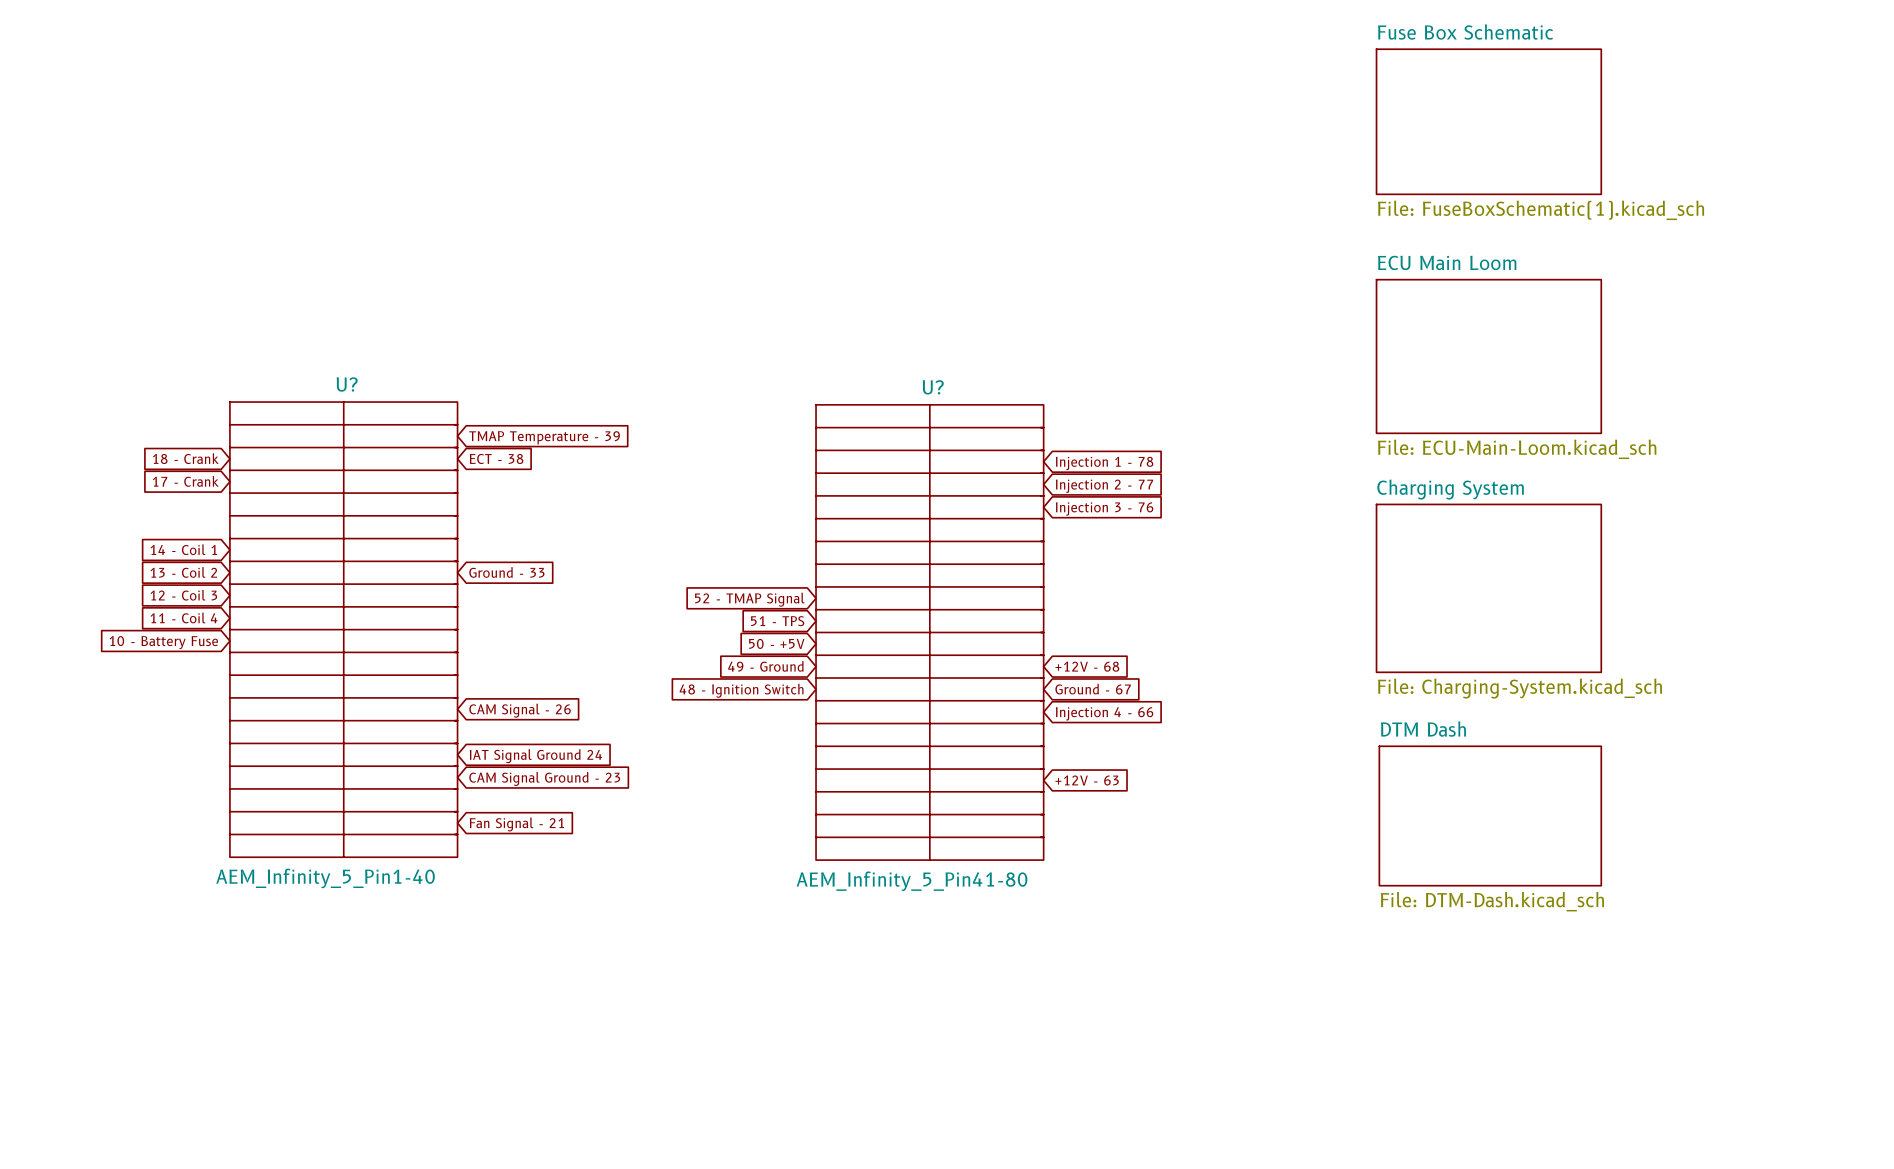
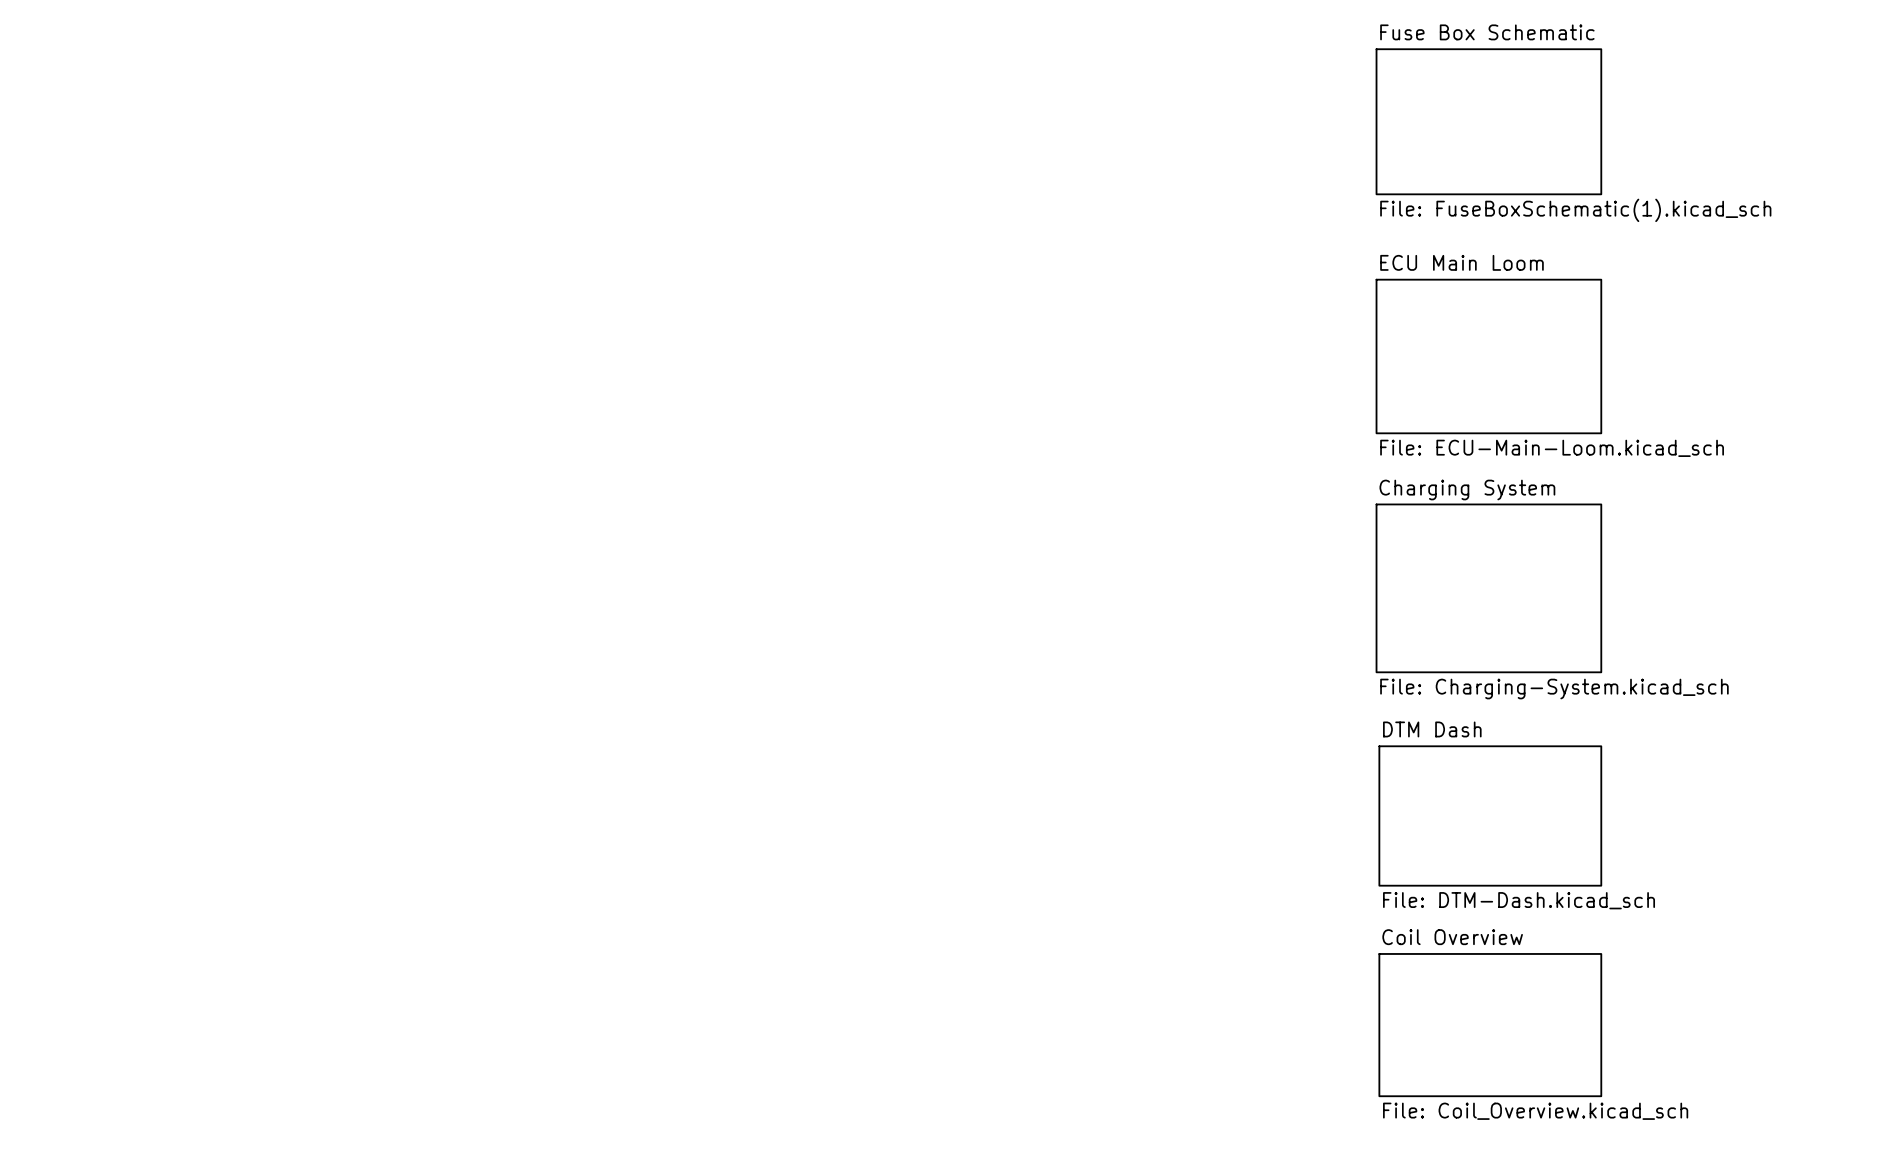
global label: TMAP Temperature - 39 (544, 437) -> none
global label: 18 - Crank (185, 458) -> none
global label: ECT - 38 (496, 458) -> none
global label: Injection 1 - 78 (1104, 463) -> none
global label: 17 - Crank (185, 481) -> none
global label: Injection 2 - 77 (1104, 486) -> none
global label: Injection 3 - 76 (1104, 508) -> none
global label: 14 - Coil 1 (183, 549) -> none
global label: 13 - Coil 2 (183, 572) -> none
global label: Ground - 33 (506, 572) -> none
global label: 12 - Coil 3 (183, 595) -> none
global label: 52 - TMAP Signal (749, 599) -> none
global label: 11 - Coil 4 (183, 617) -> none
global label: 51 - TPS (777, 621) -> none
U?: AEM_Infinity_5_Pin1-40 (343, 629) -> none
U?: AEM_Infinity_5_Pin41-80 (929, 632) -> none
global label: 10 - Battery Fuse (163, 642) -> none
global label: 50 - +5V (776, 643) -> none
global label: 49 - Ground (765, 666) -> none
global label: +12V - 68 (1087, 666) -> none
global label: Ground - 67 (1093, 689) -> none
global label: 48 - Ignition Switch (741, 690) -> none
global label: CAM Signal - 26 (520, 710) -> none
global label: Injection 4 - 66 (1104, 713) -> none
global label: IAT Signal Ground 24 (535, 756) -> none
global label: CAM Signal Ground - 23 (544, 778) -> none
global label: +12V - 63 (1087, 780) -> none
global label: Fan Signal - 21 (516, 824) -> none
sheet Coil Overview: none -> File: Coil_Overview.kicad_sch (1490, 1025)

